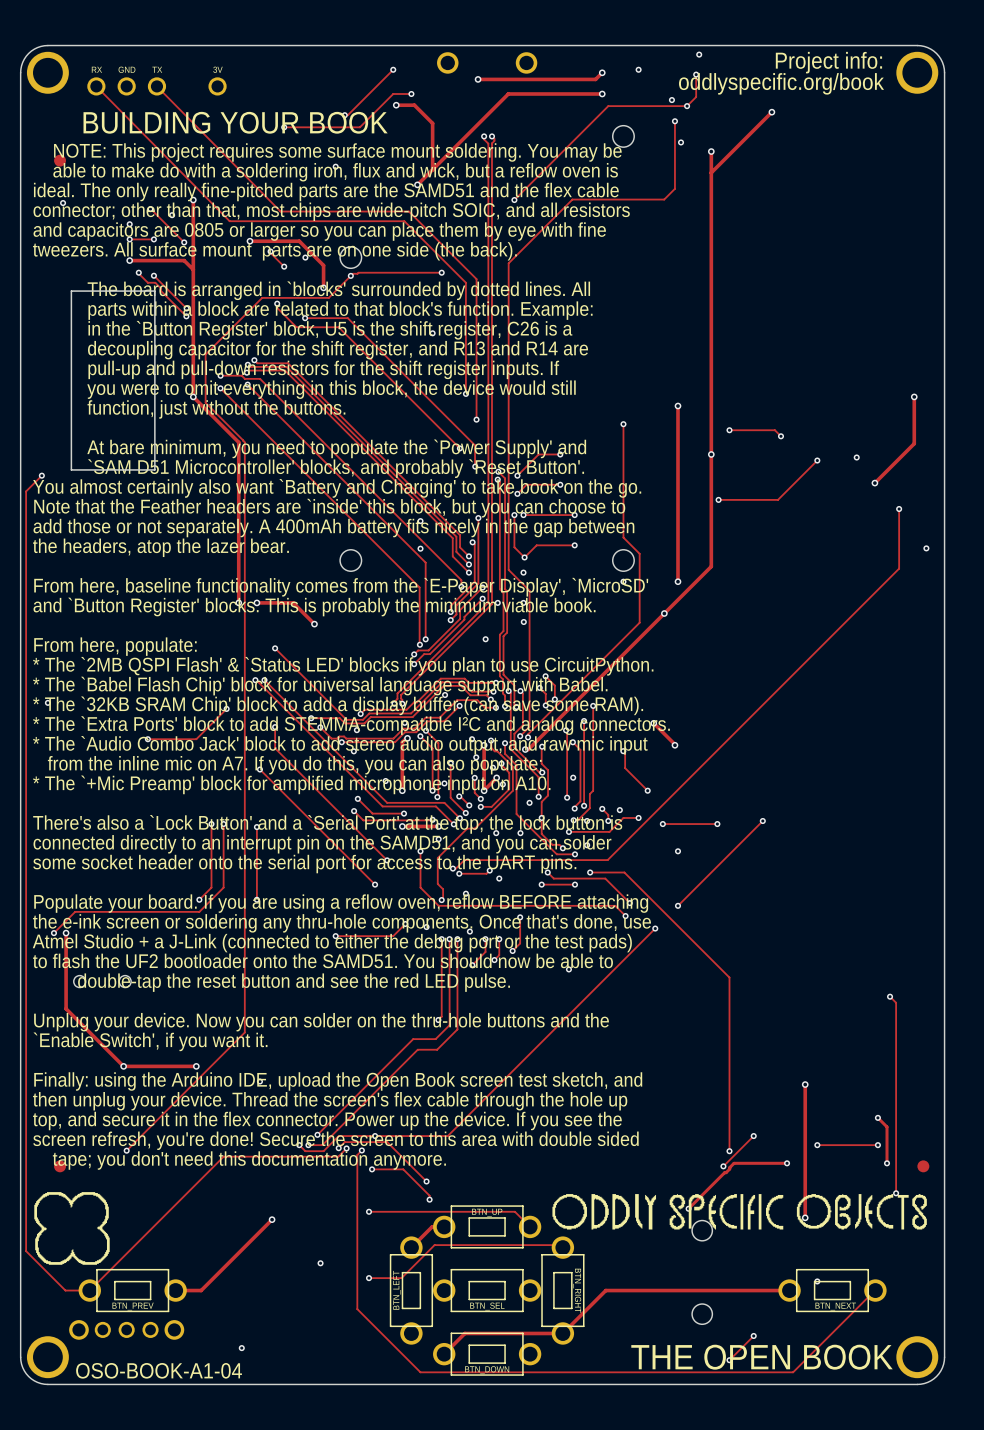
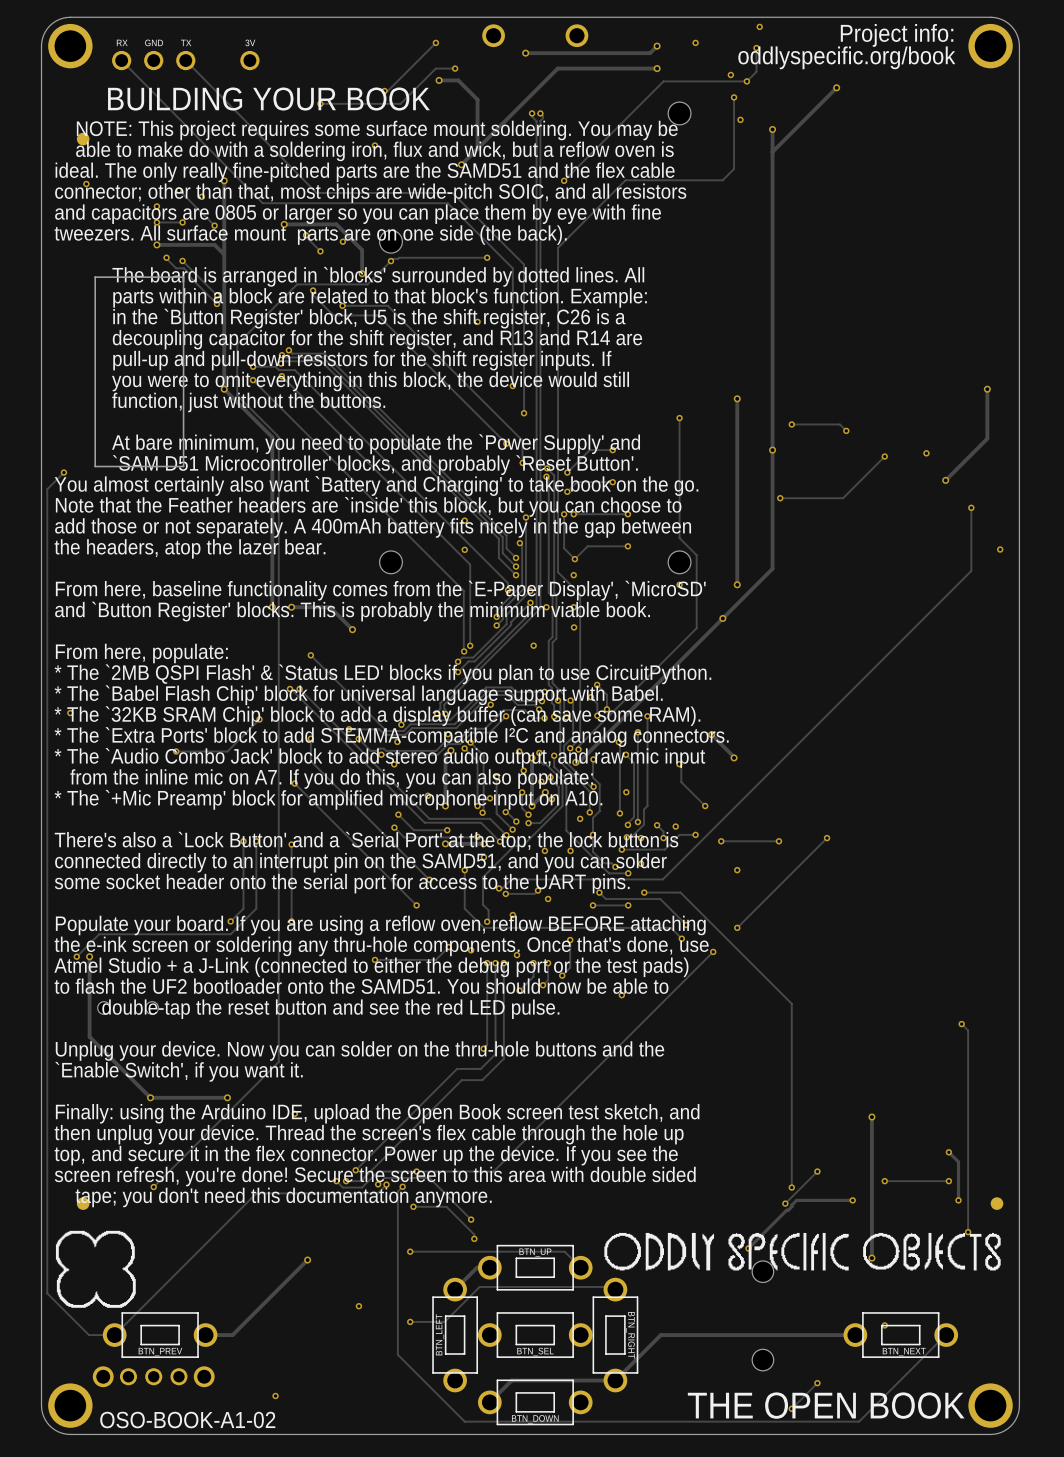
text: OSO-BOOK-A1-04 (159, 1370) -> OSO-BOOK-A1-02 (187, 1420)

